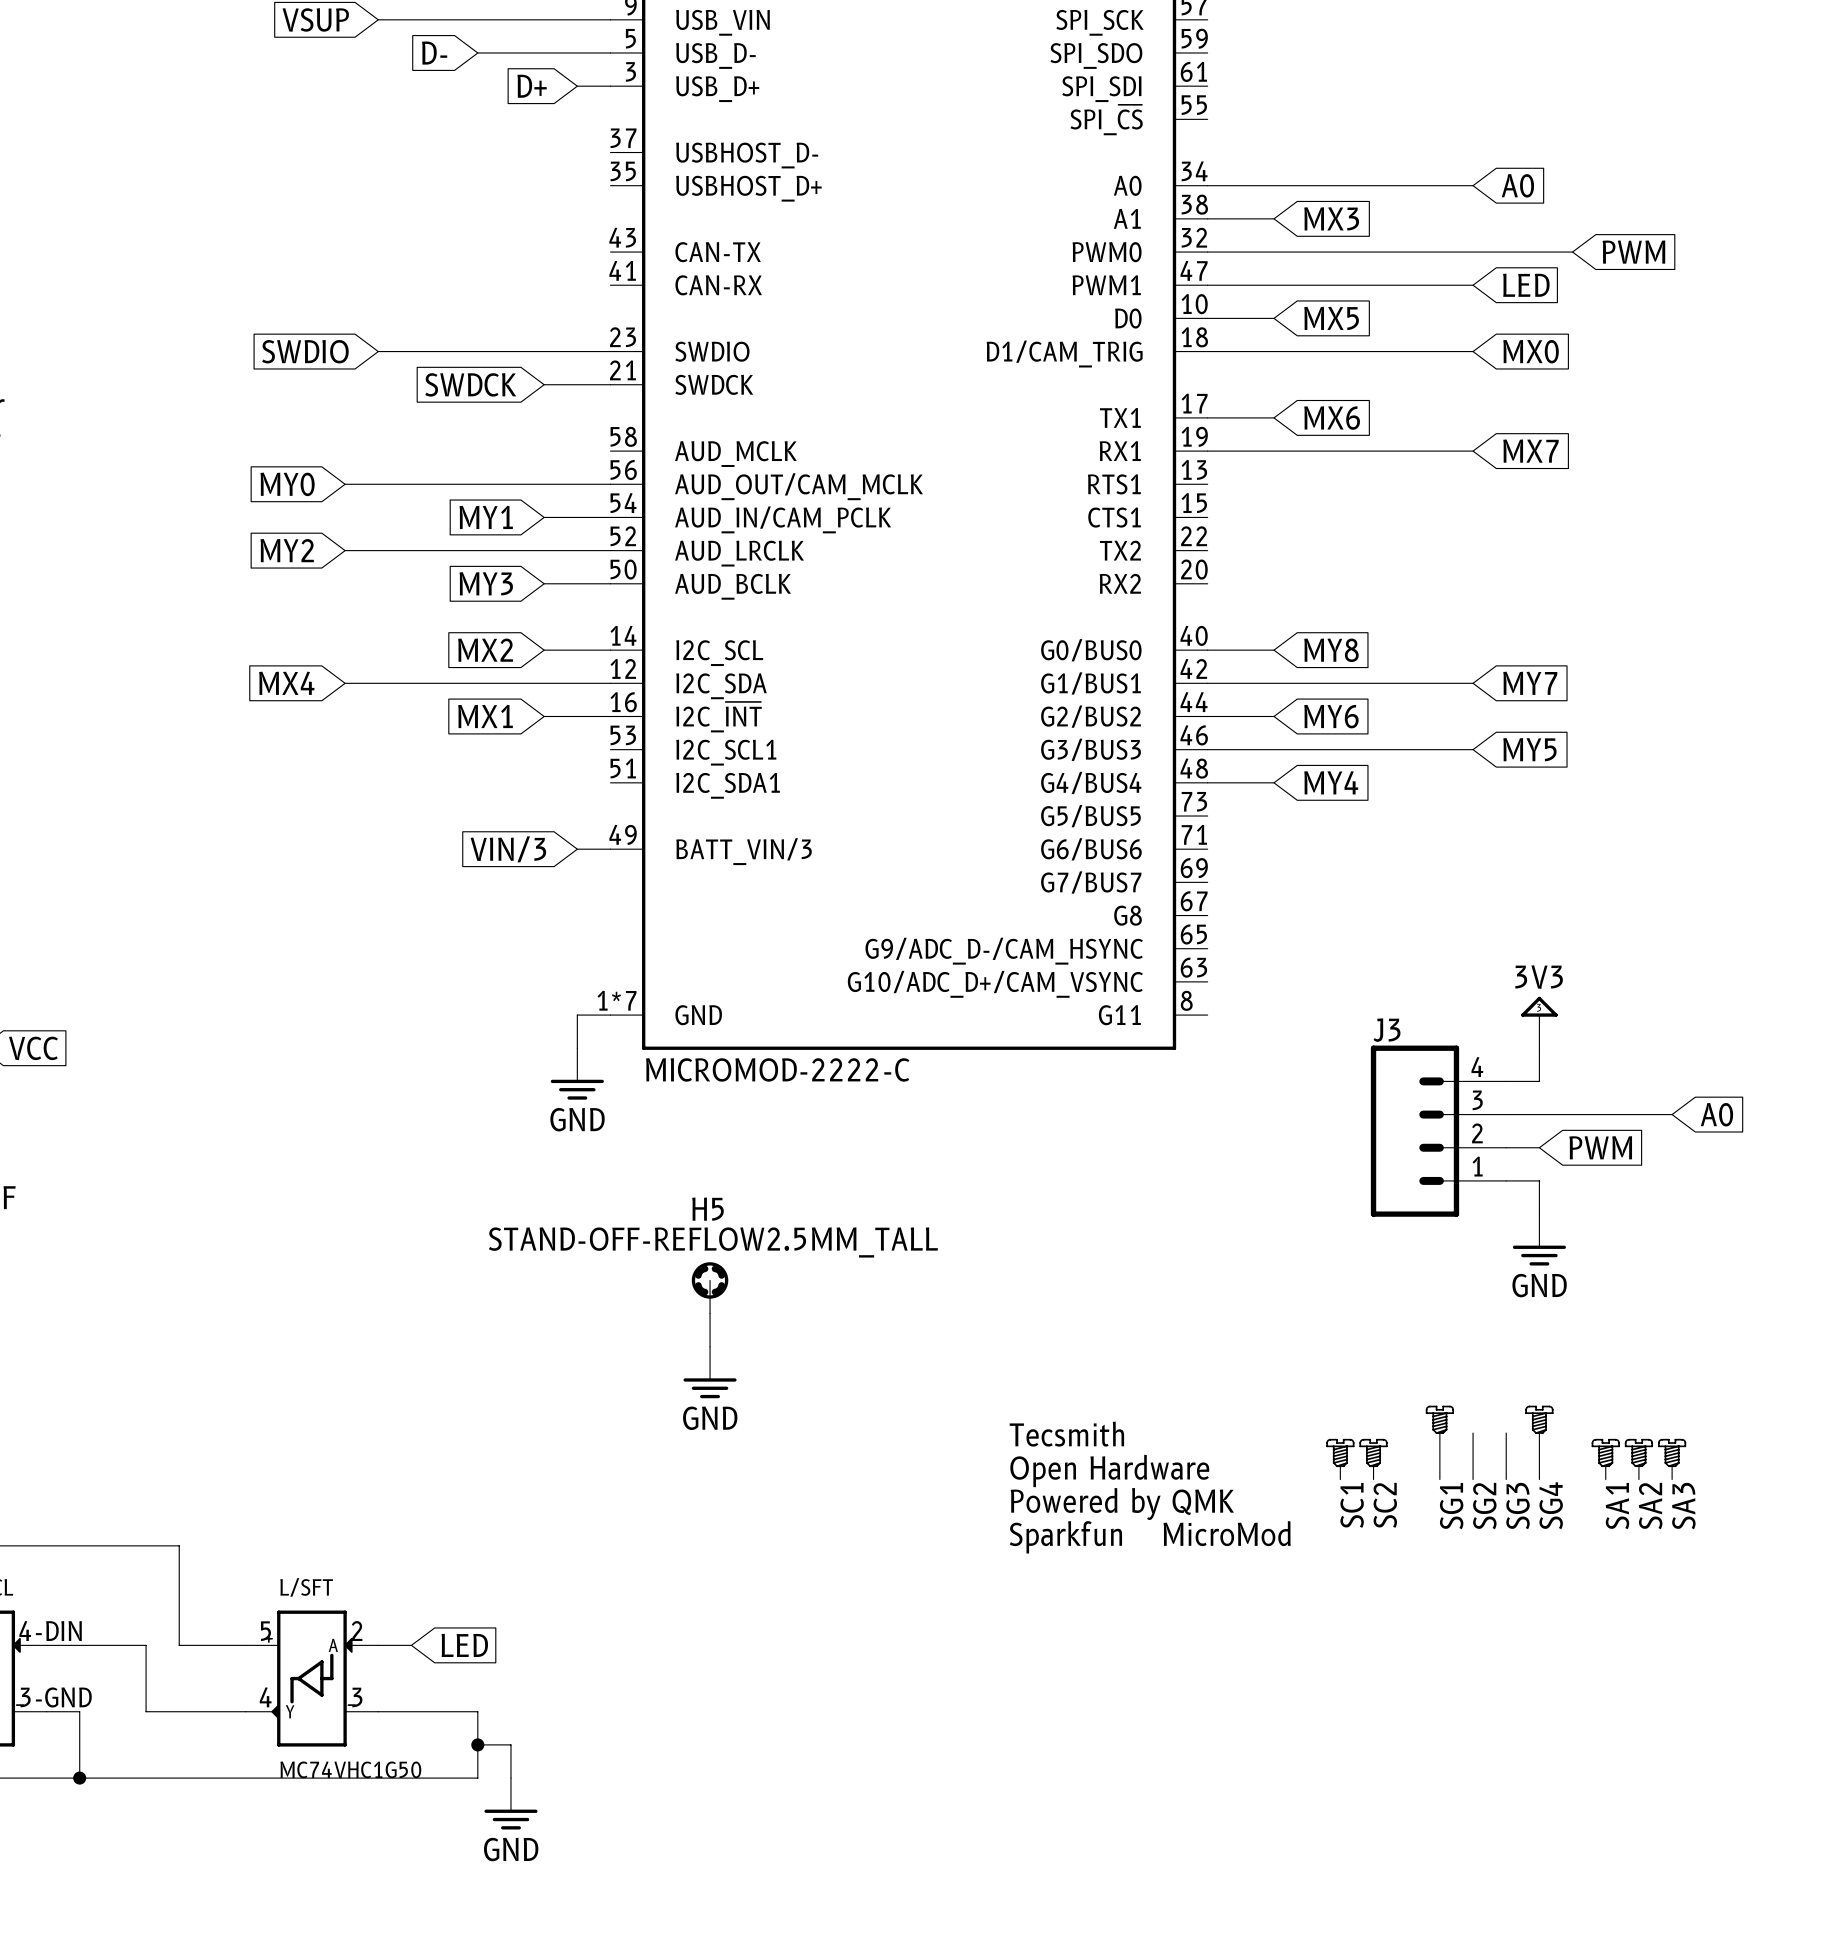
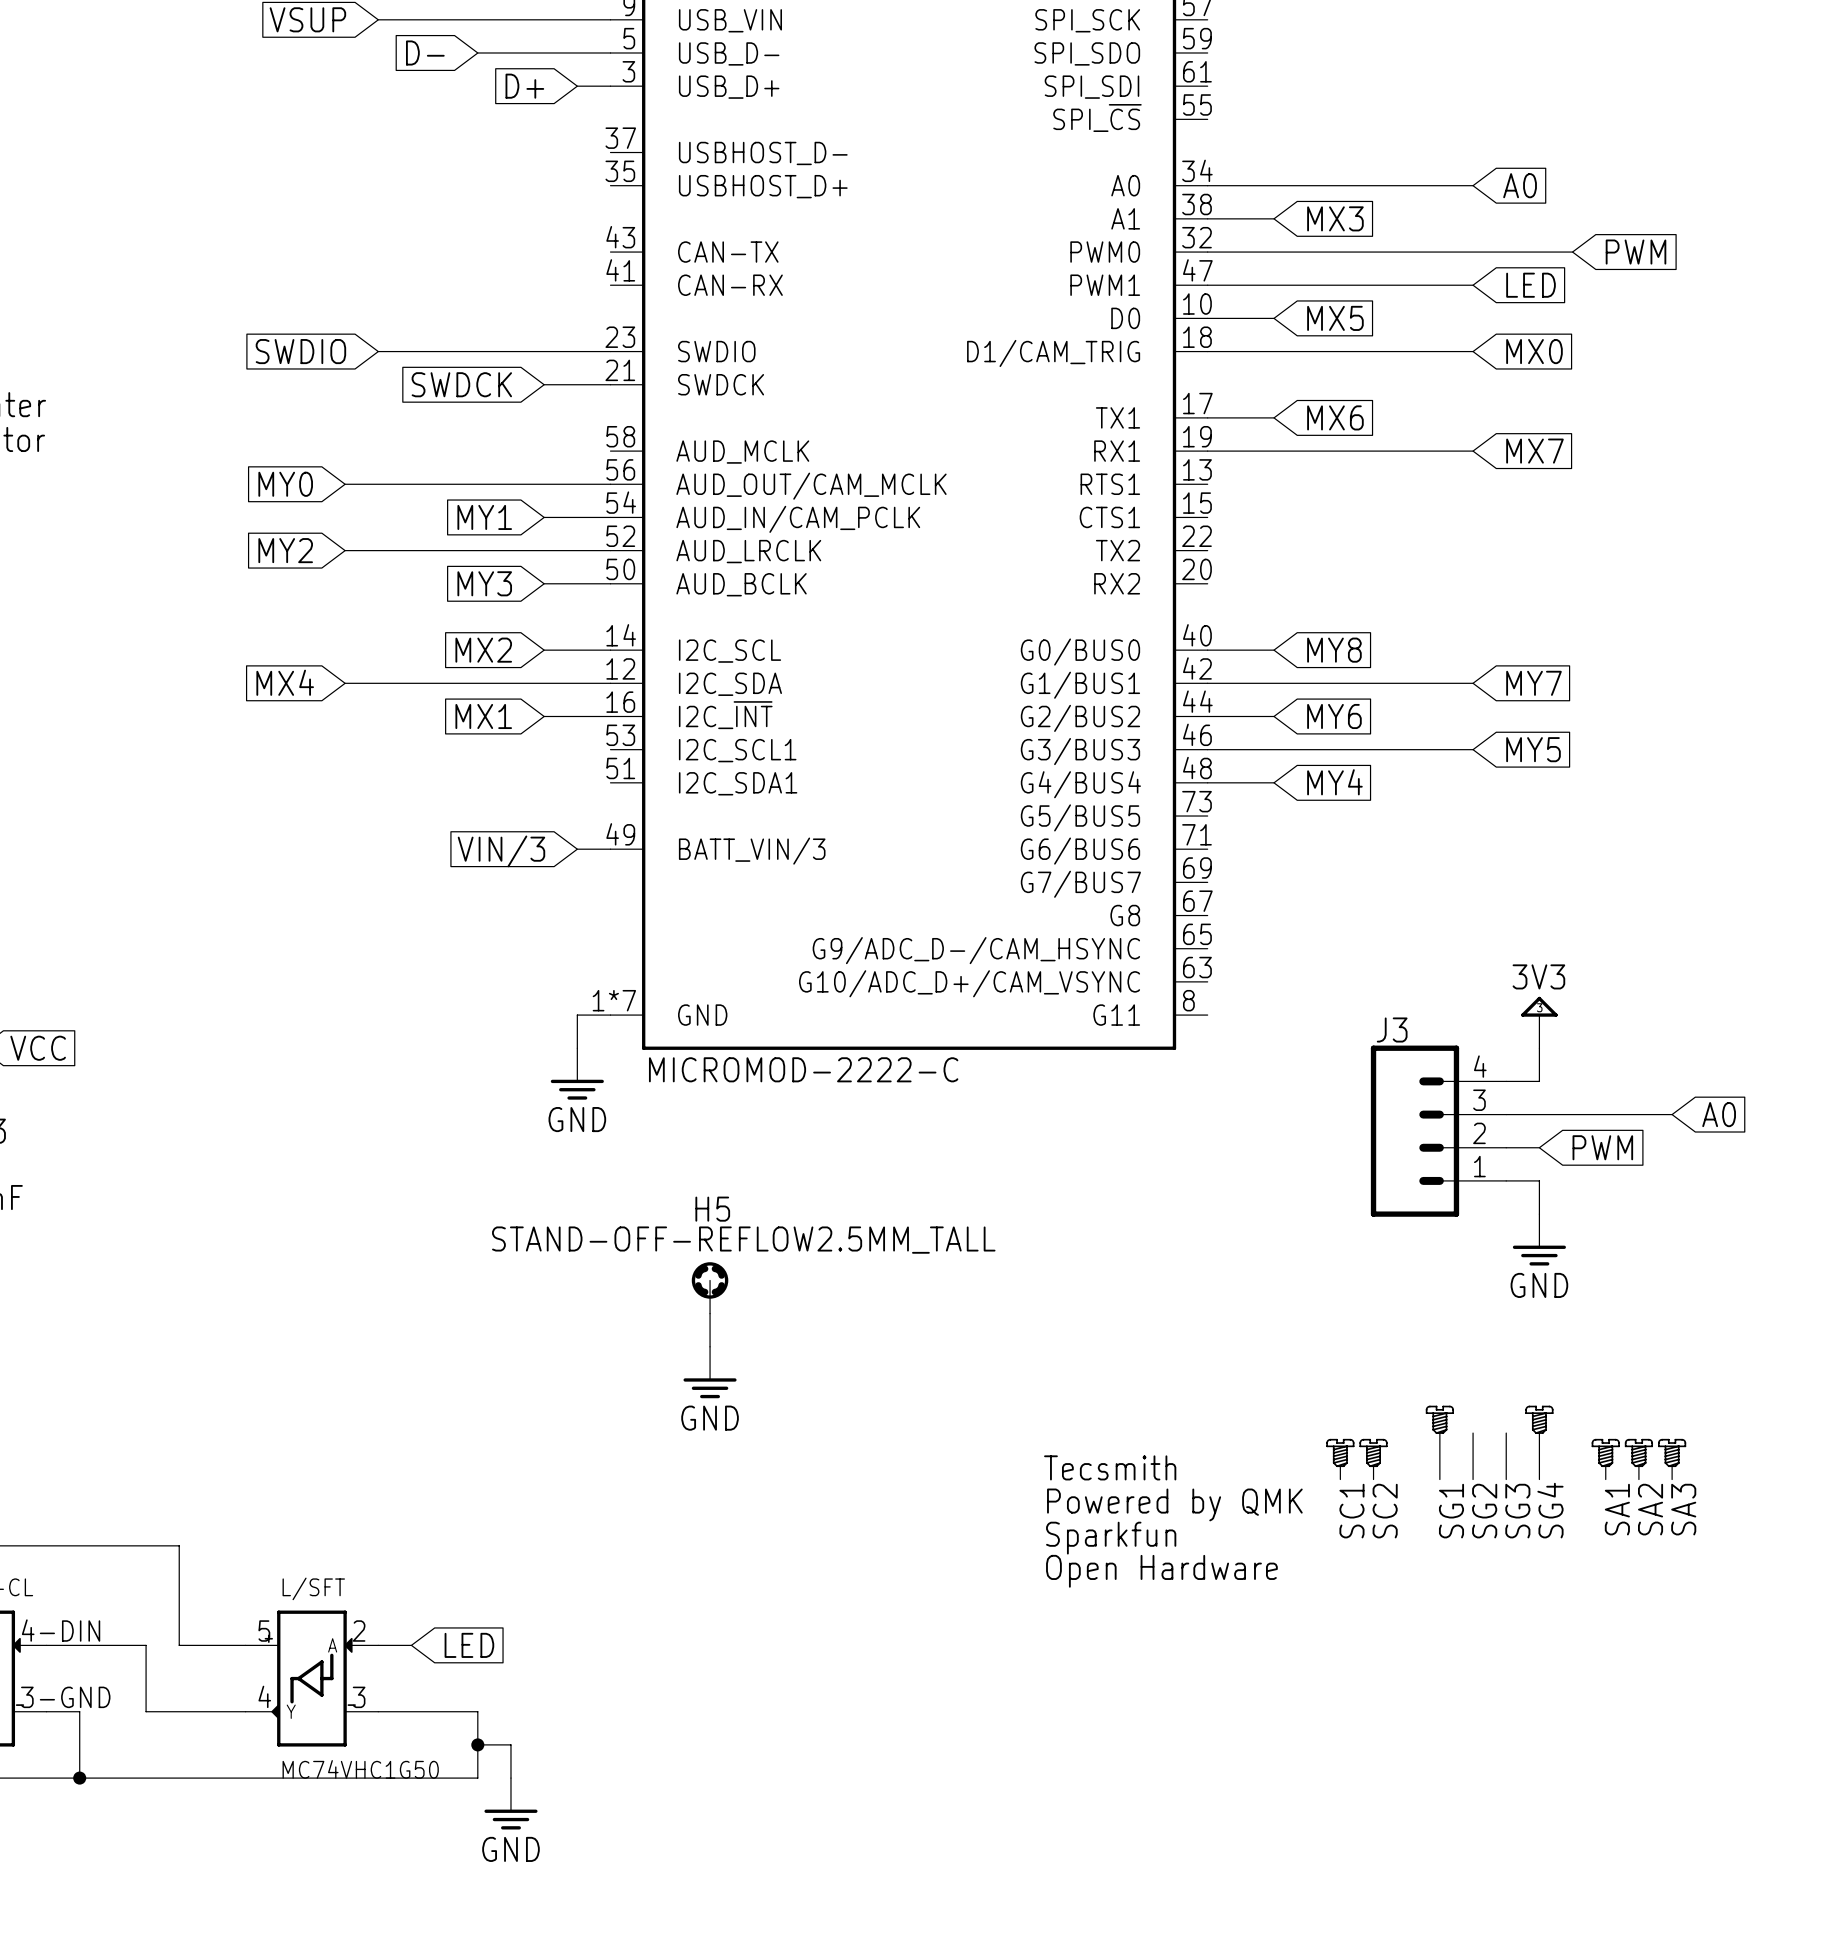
part position: (1066, 1434) -> (1110, 1467)
part position: (1109, 1470) -> (1161, 1571)
part position: (1122, 1503) -> (1174, 1504)
part: (1227, 1533) -> none
part position: (1065, 1537) -> (1111, 1538)

